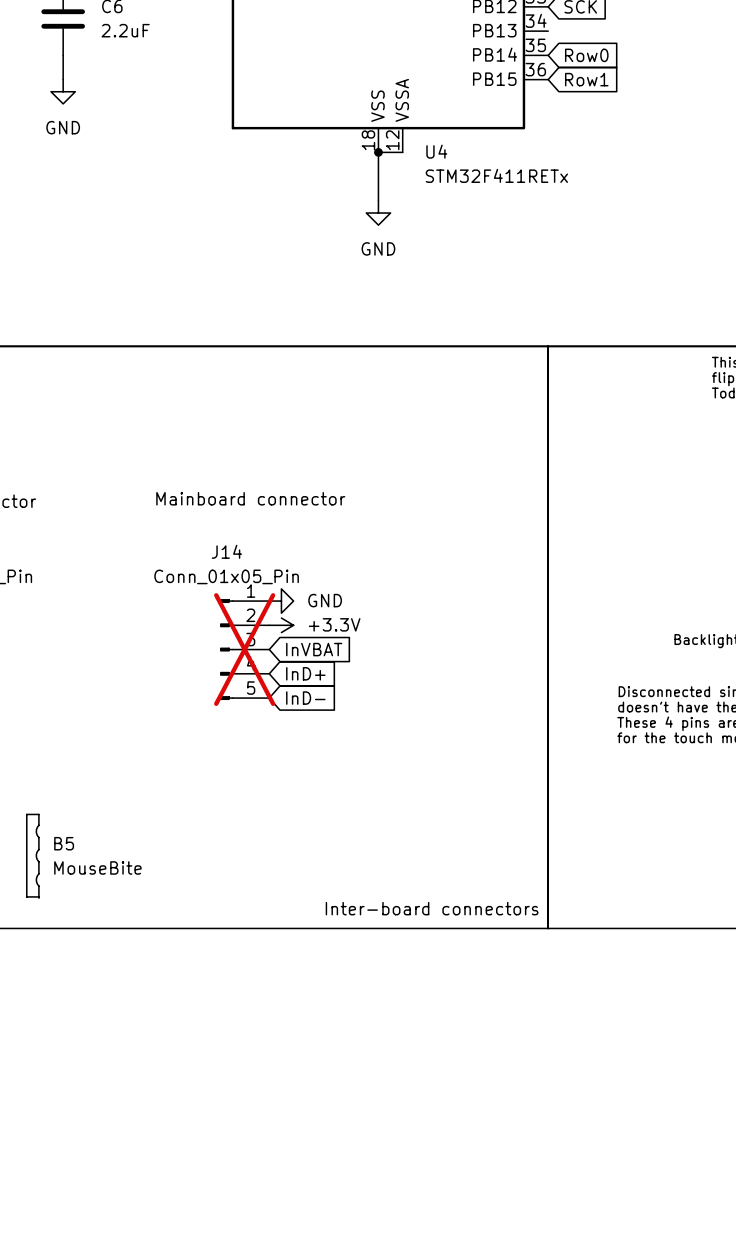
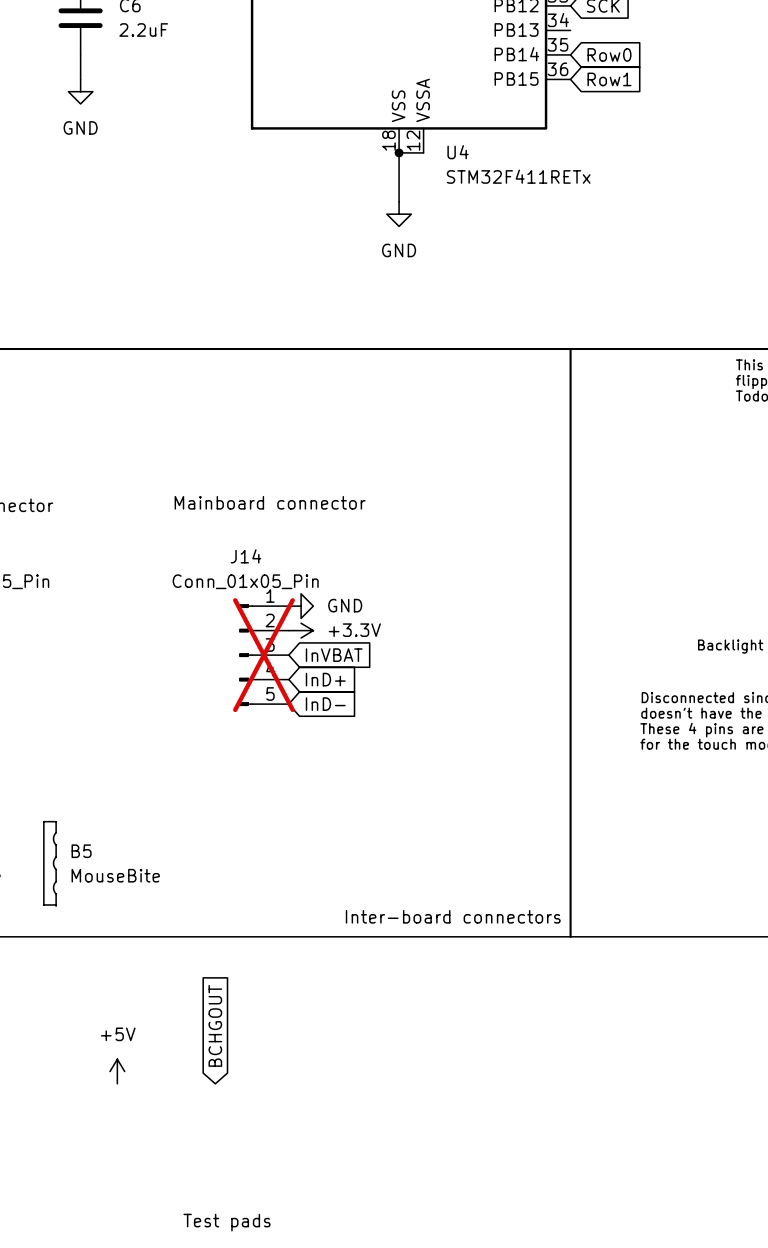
global label: none -> BCHGOUT (215, 1025)
power symbol: none -> +5V (117, 1071)
text: none -> Test pads (227, 1222)

